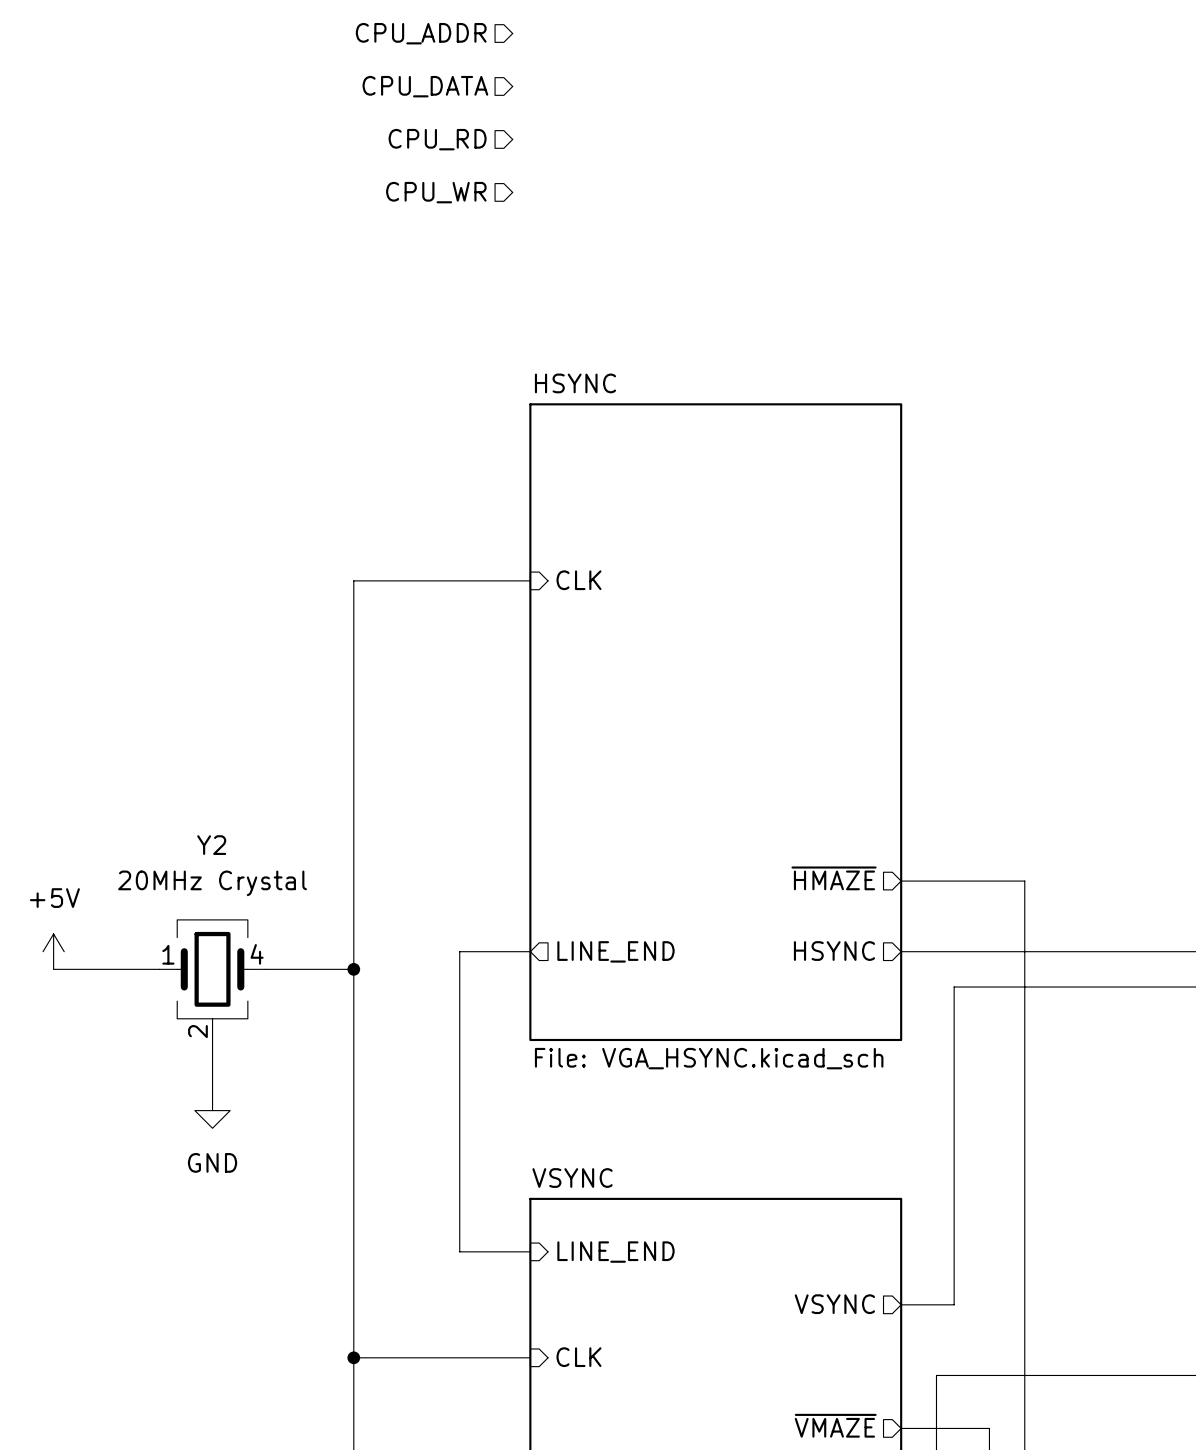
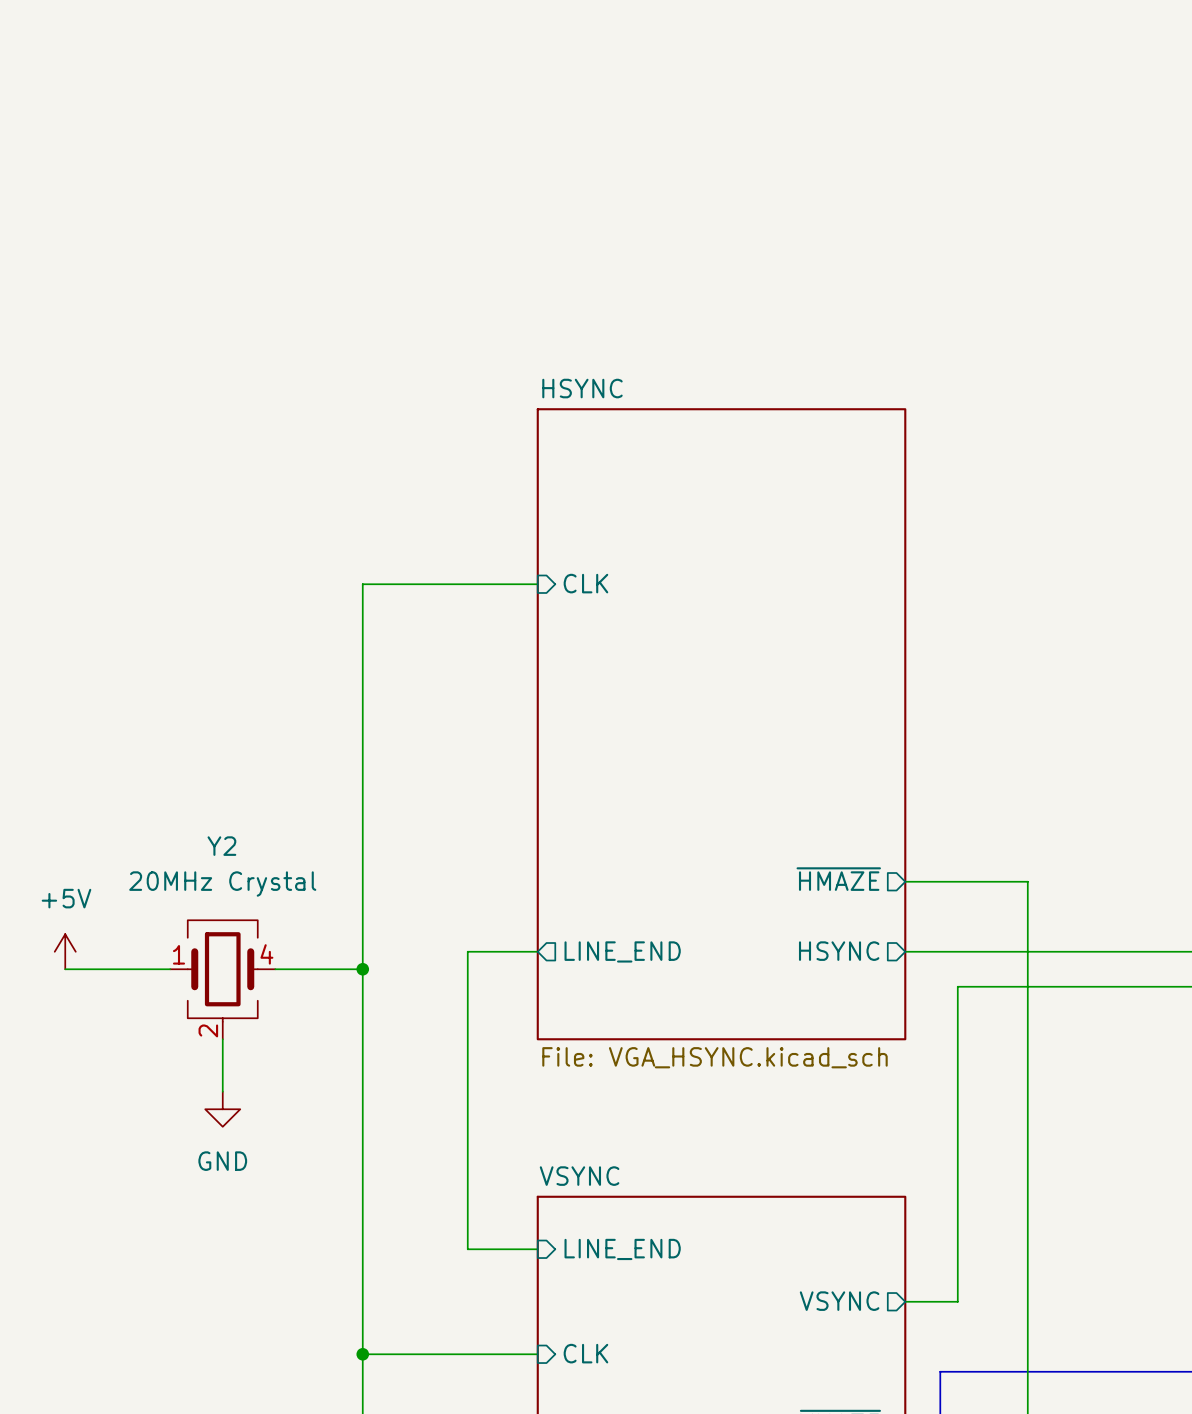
hierarchical label: CPU_ADDR (421, 33) -> none
hierarchical label: CPU_DATA (425, 86) -> none
hierarchical label: CPU_RD (437, 139) -> none
hierarchical label: CPU_WR (436, 192) -> none

